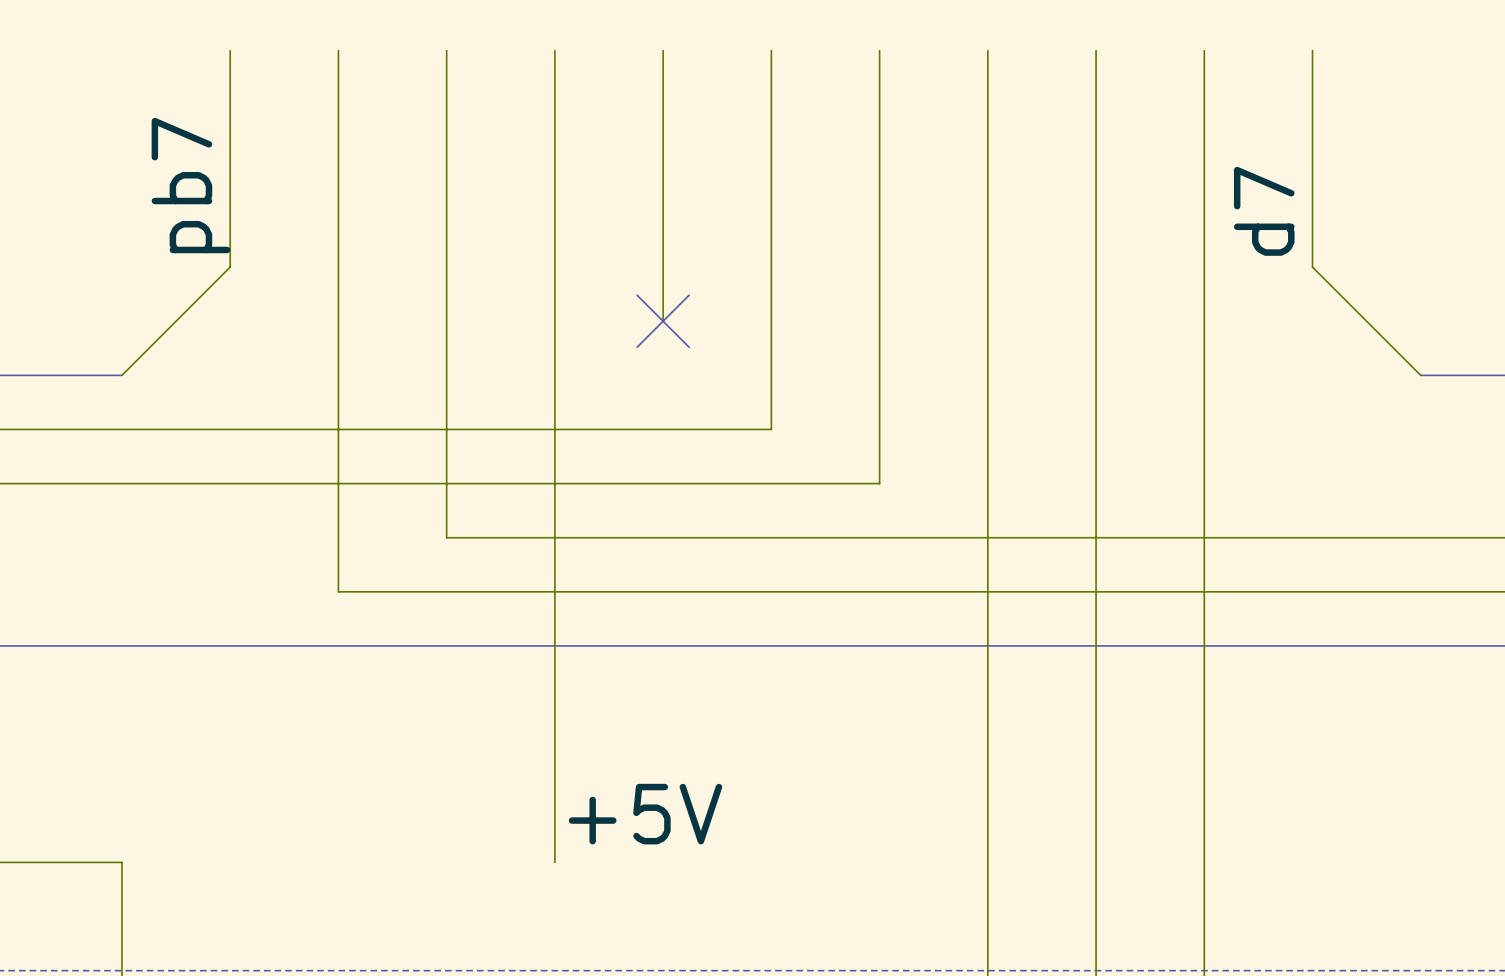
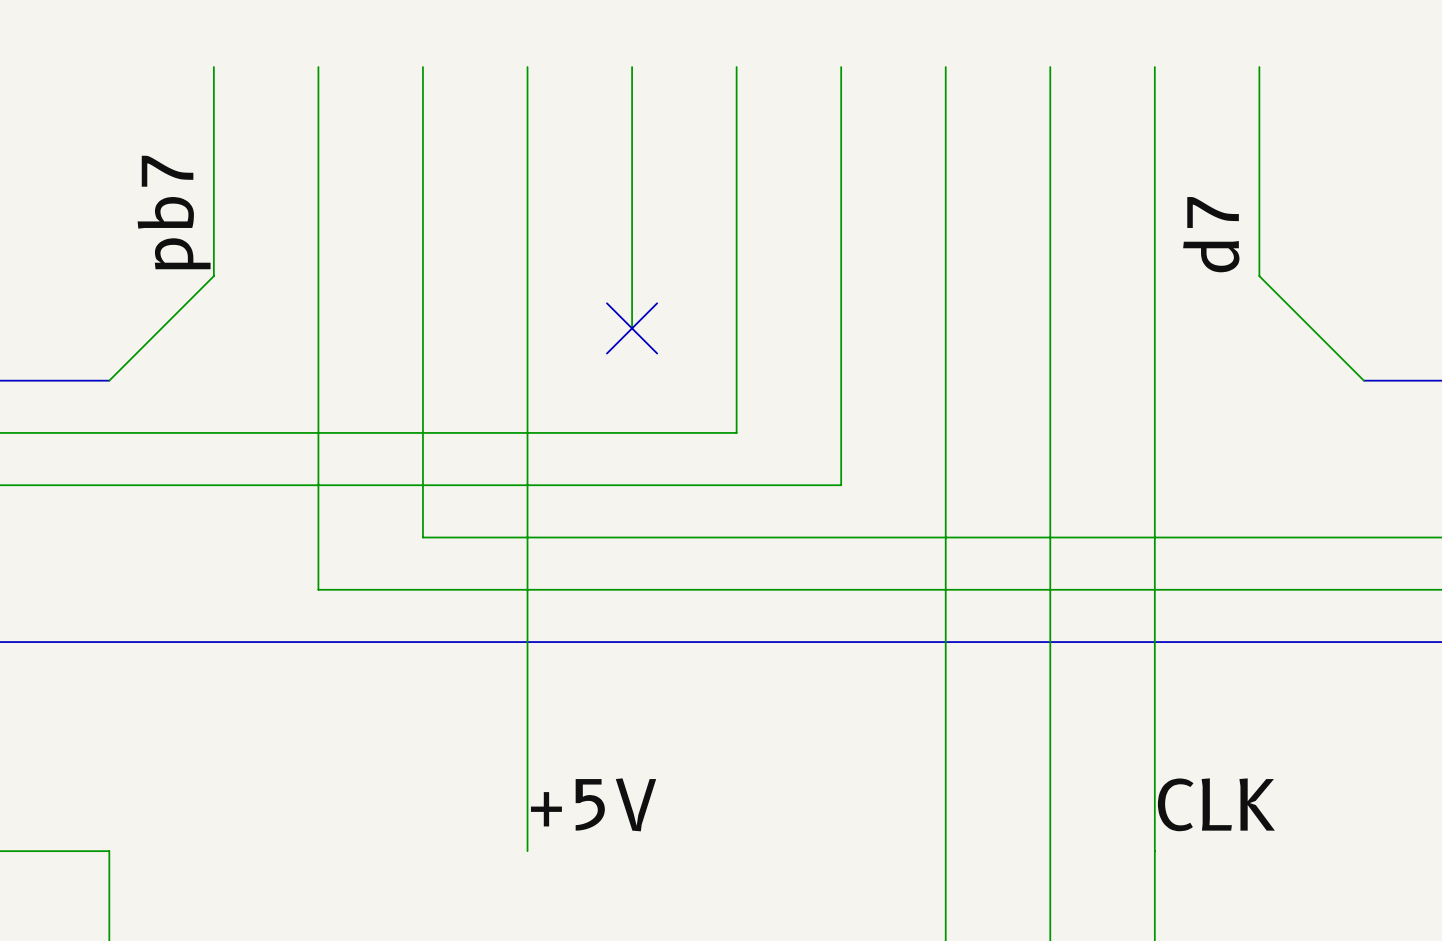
label: none -> CLK (1216, 804)

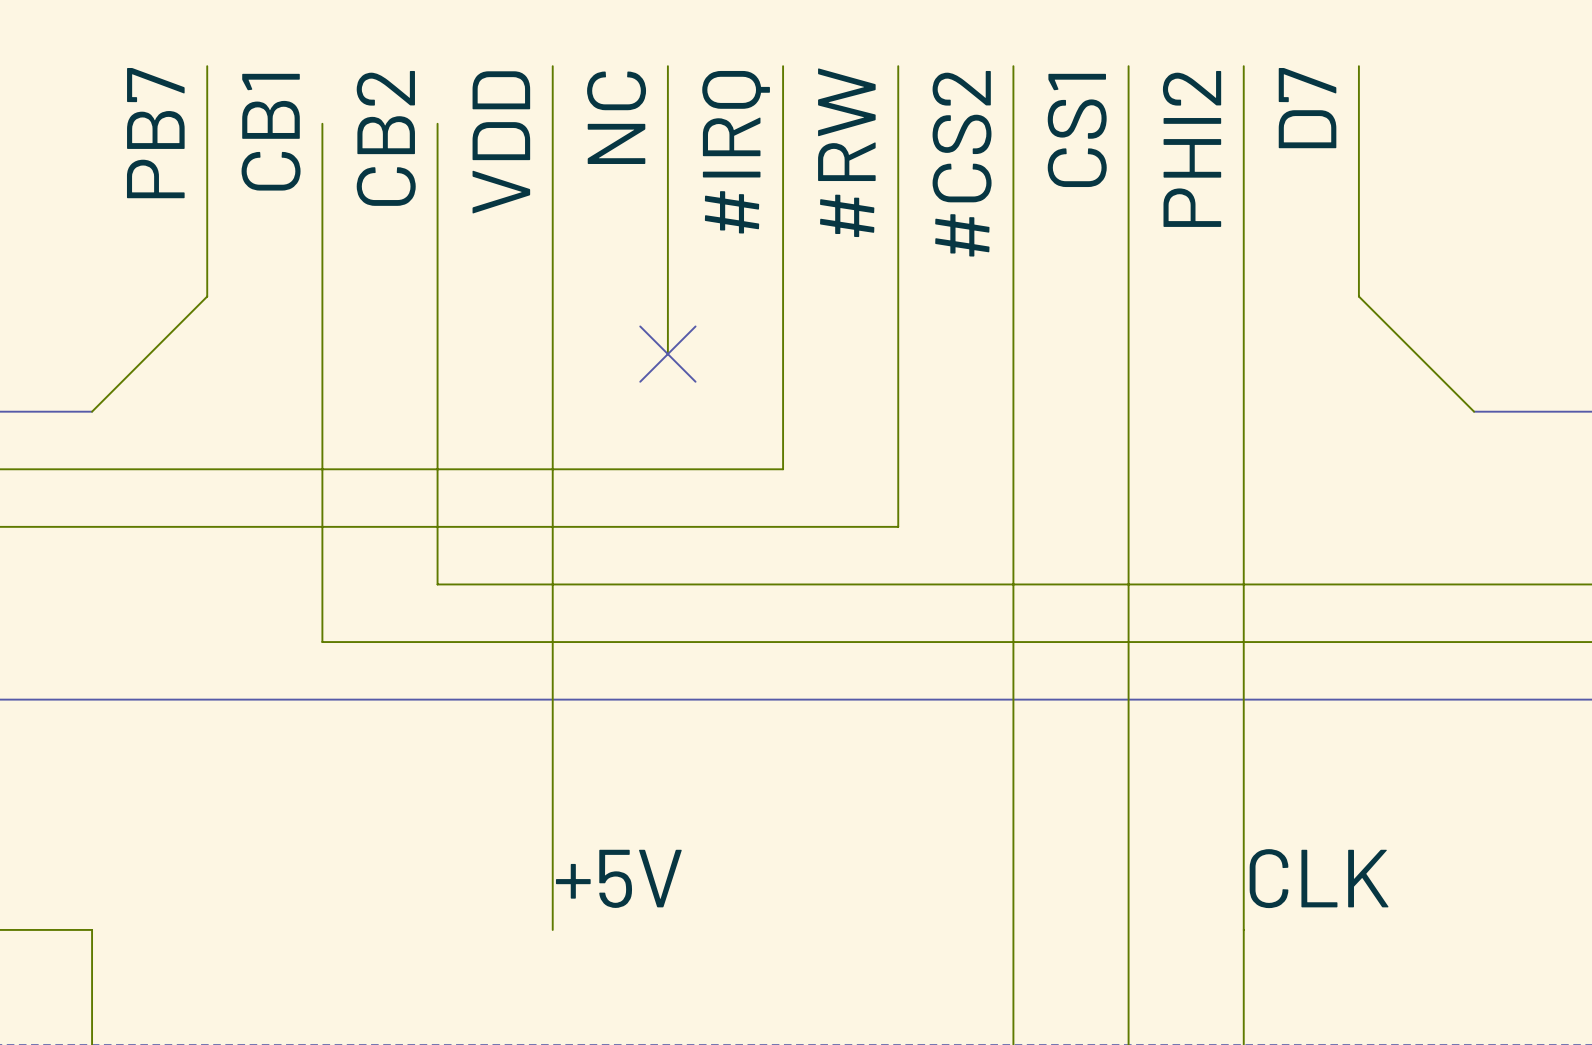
wire: (318, 67) (318, 119) -> none
wire: (422, 67) (422, 119) -> none
label: none -> NC (616, 117)
label: none -> D7 (1307, 108)
label: none -> CS1 (1077, 130)
label: none -> PB7 (155, 133)
label: none -> VDD (501, 142)
label: none -> CB1 (271, 132)
label: none -> CB2 (386, 138)
label: none -> PHI2 (1192, 148)
label: none -> #RW (846, 152)
label: none -> #IRQ (736, 152)
label: none -> #CS2 (962, 163)
label: pb7 (174, 212) -> none
label: d7 (1211, 234) -> none

